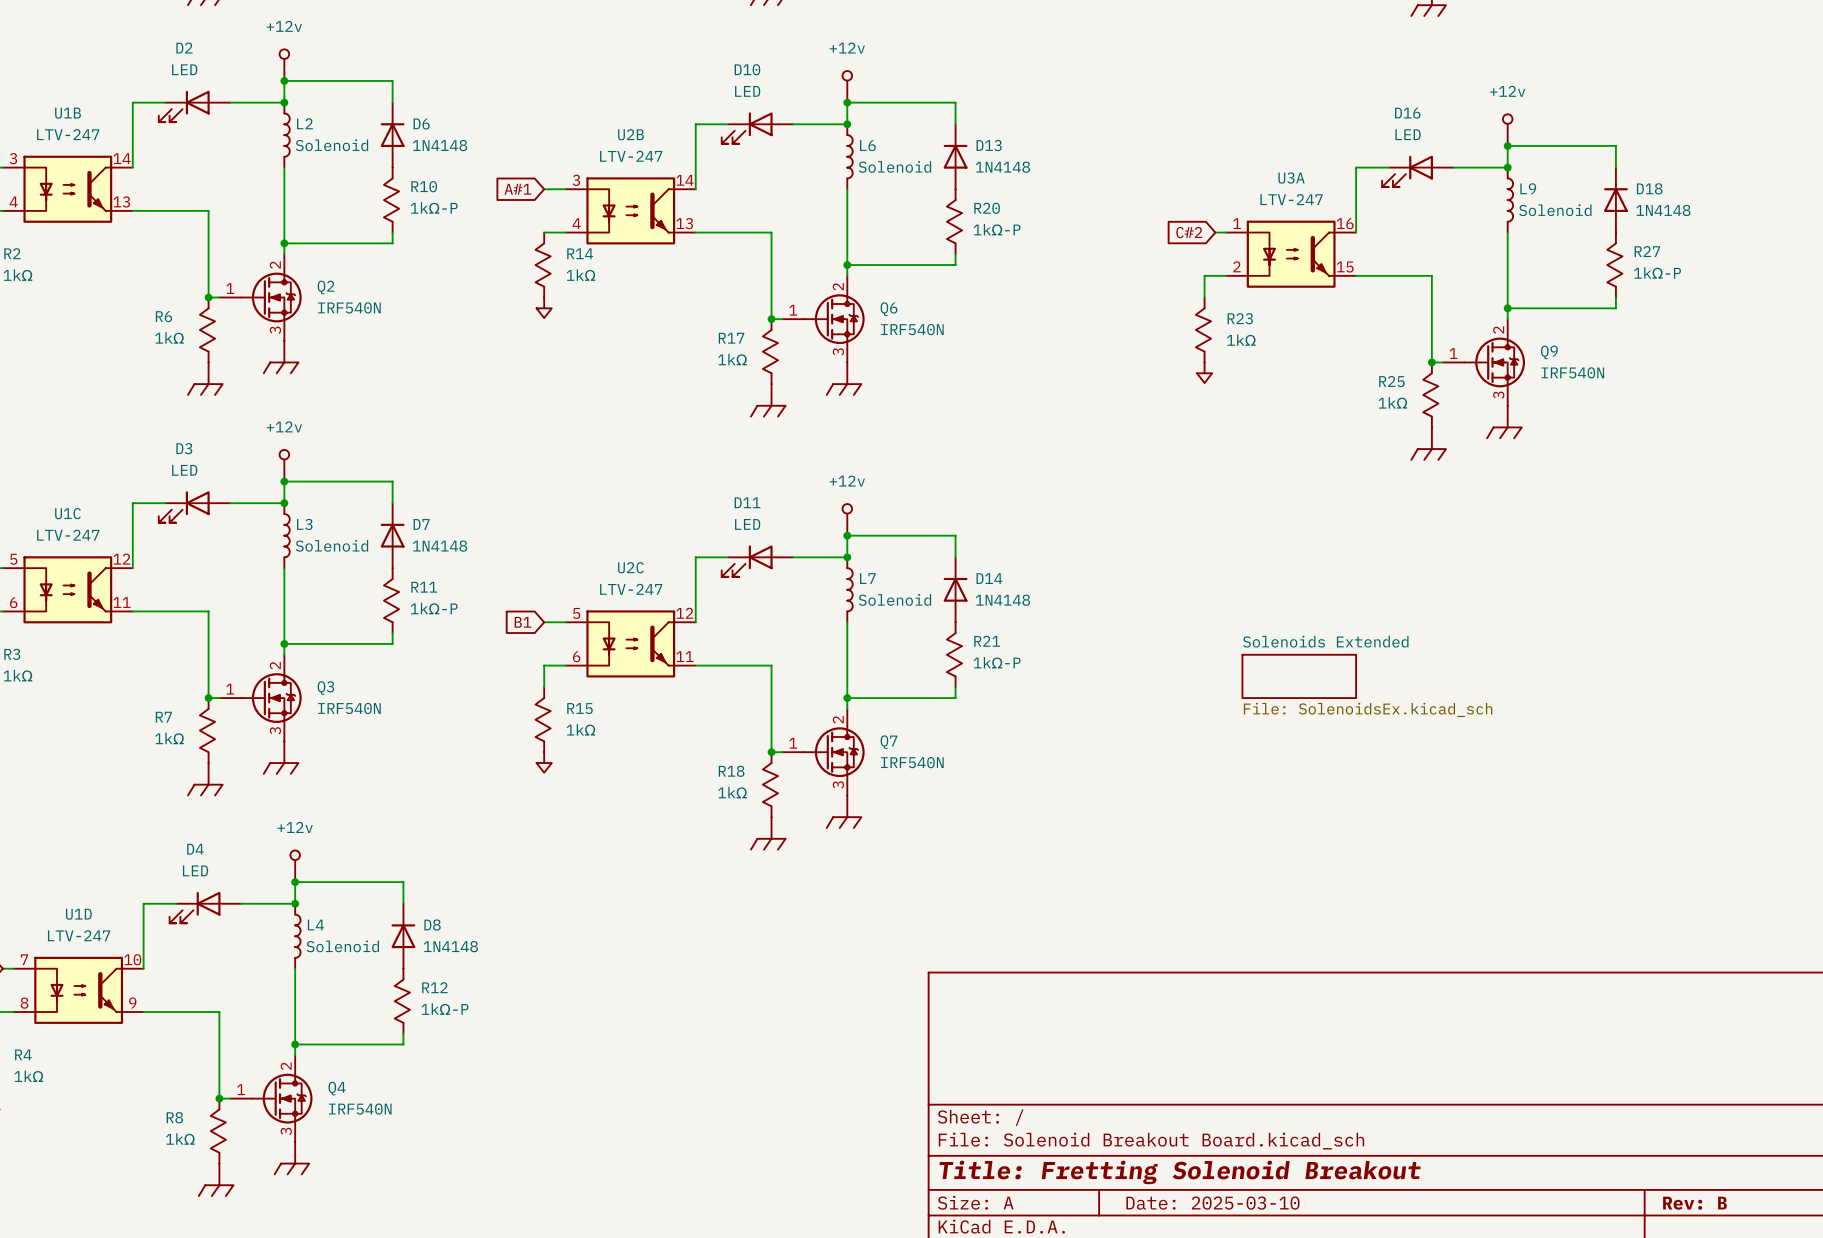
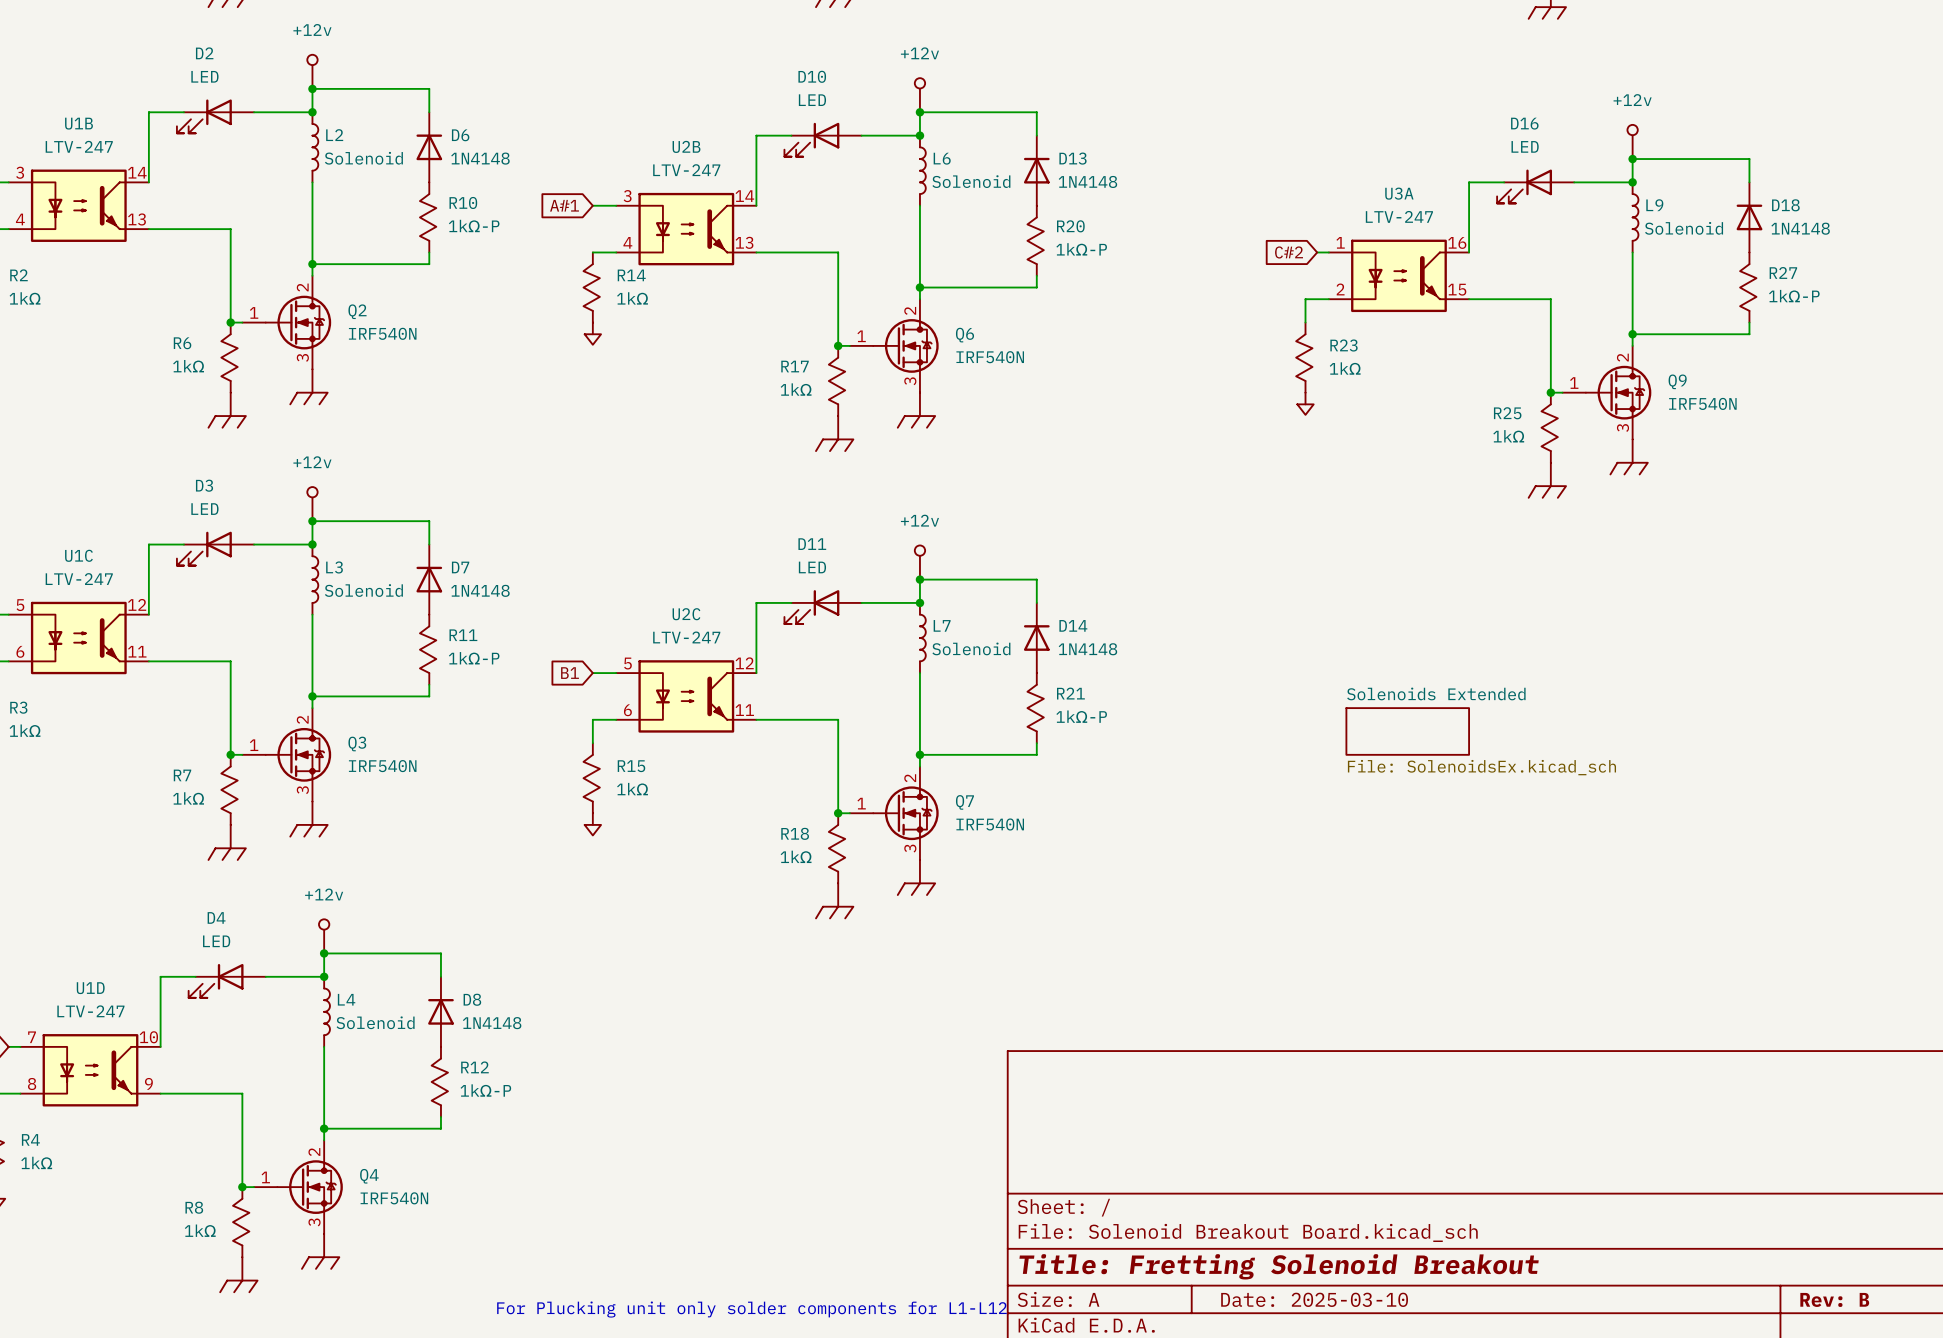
text: none -> For Plucking unit only solder components for L1-L12 (751, 1309)

